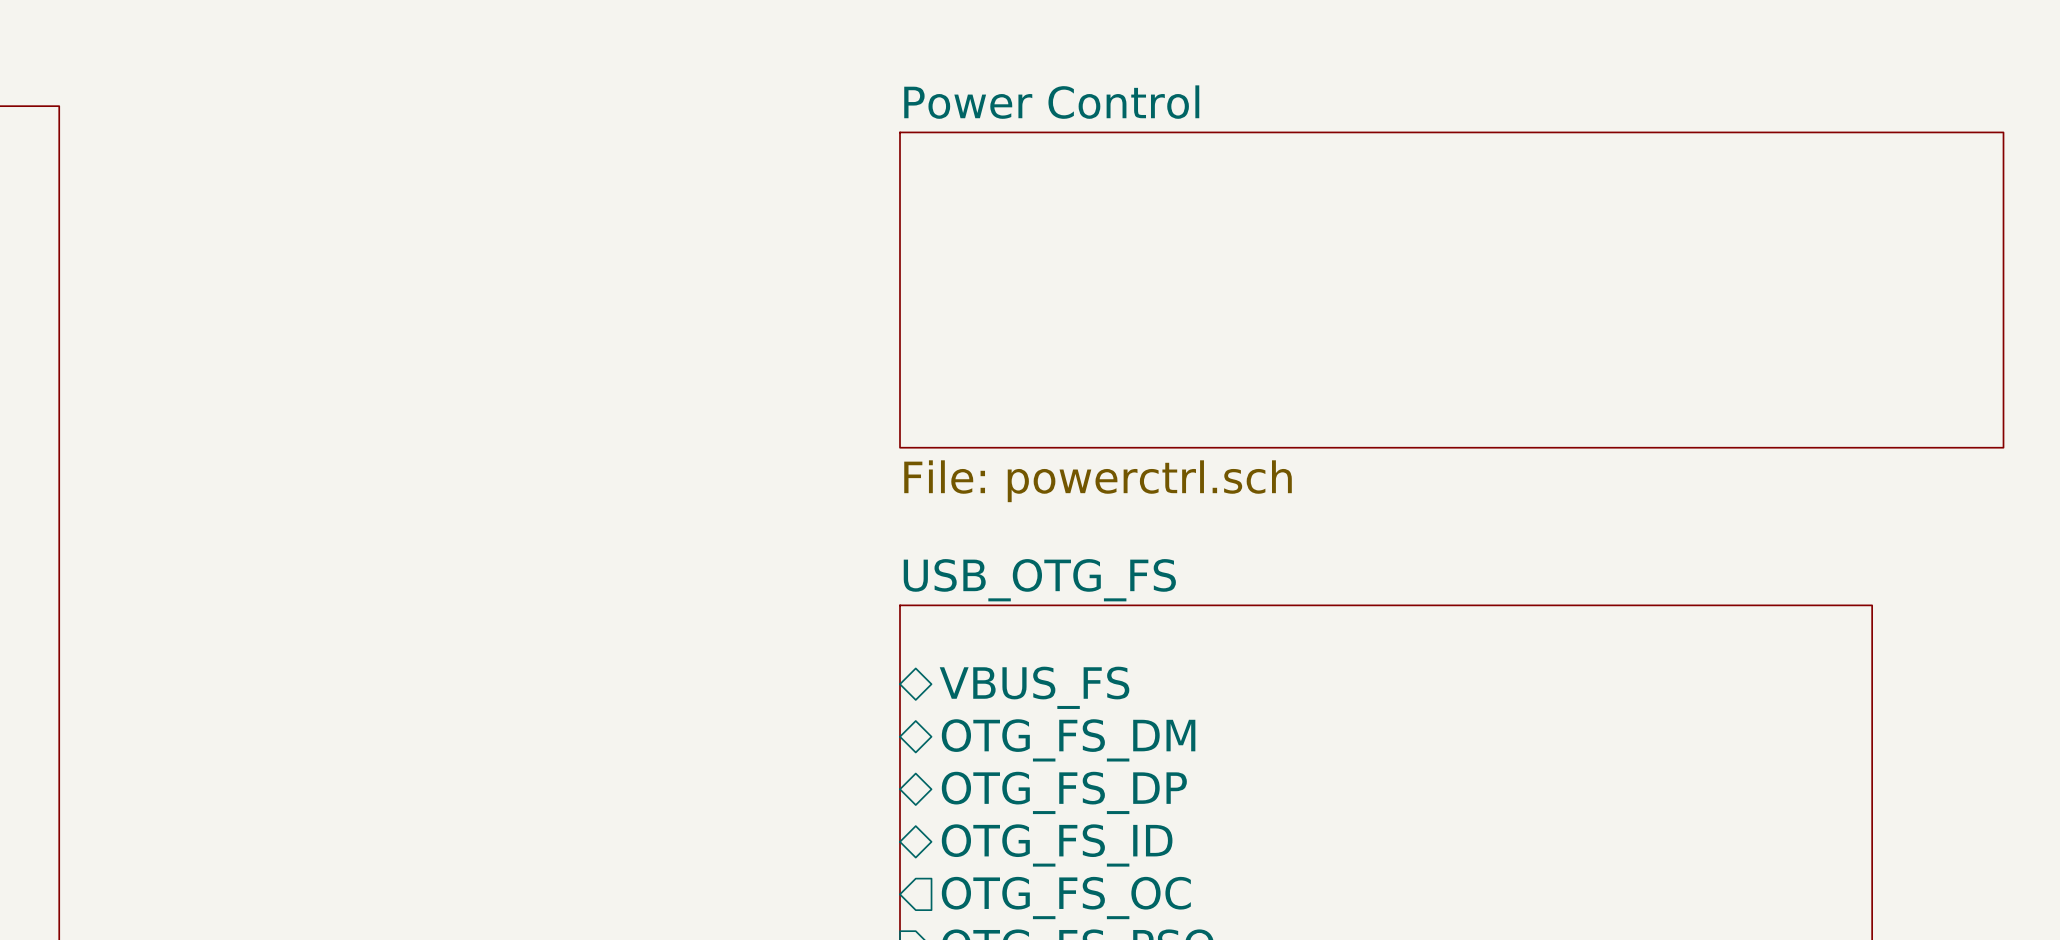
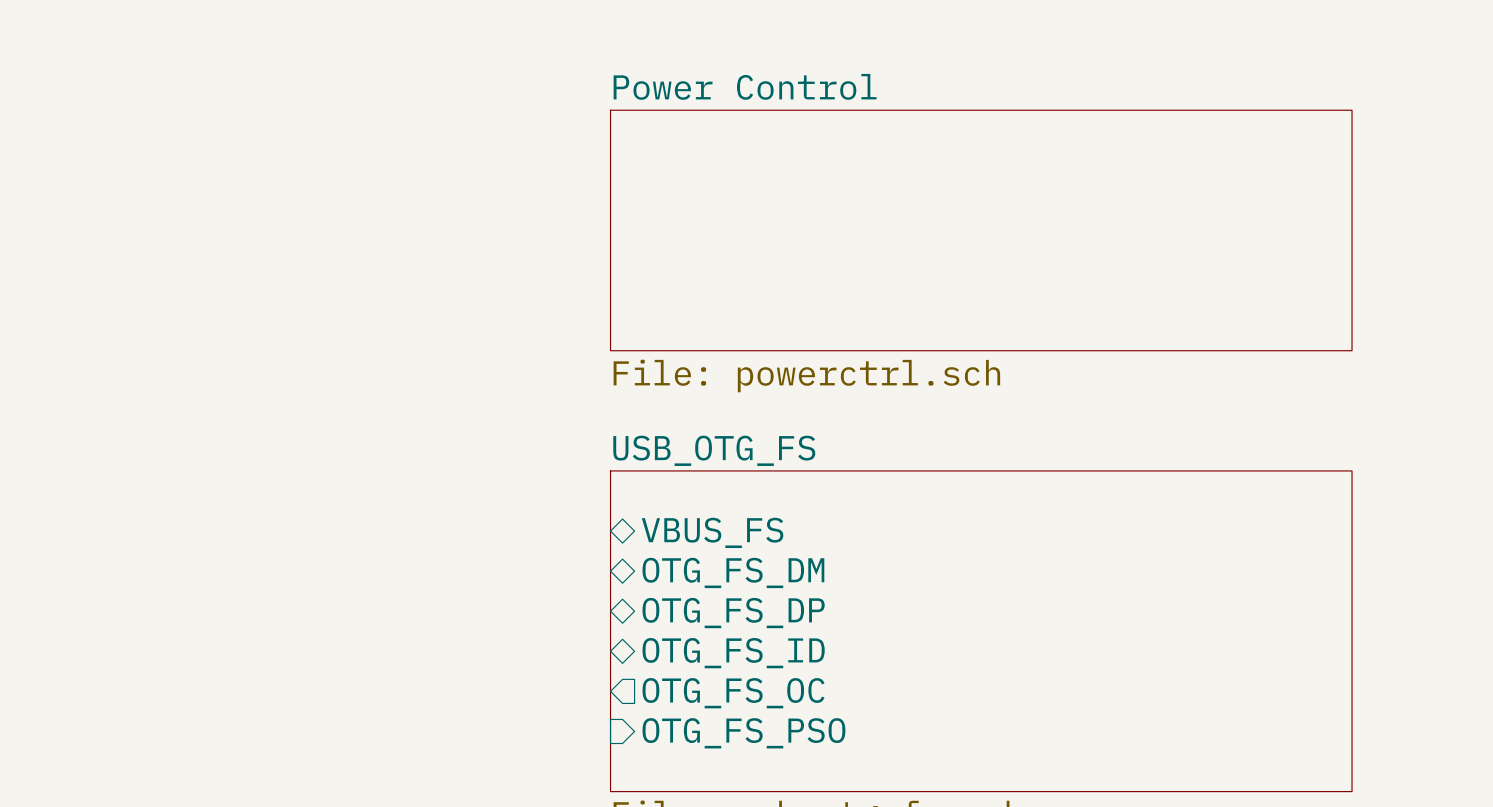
sheet Power Control: none -> File: powerctrl.sch (981, 230)
sheet Power Control: File: powerctrl.sch (1451, 290) -> none

